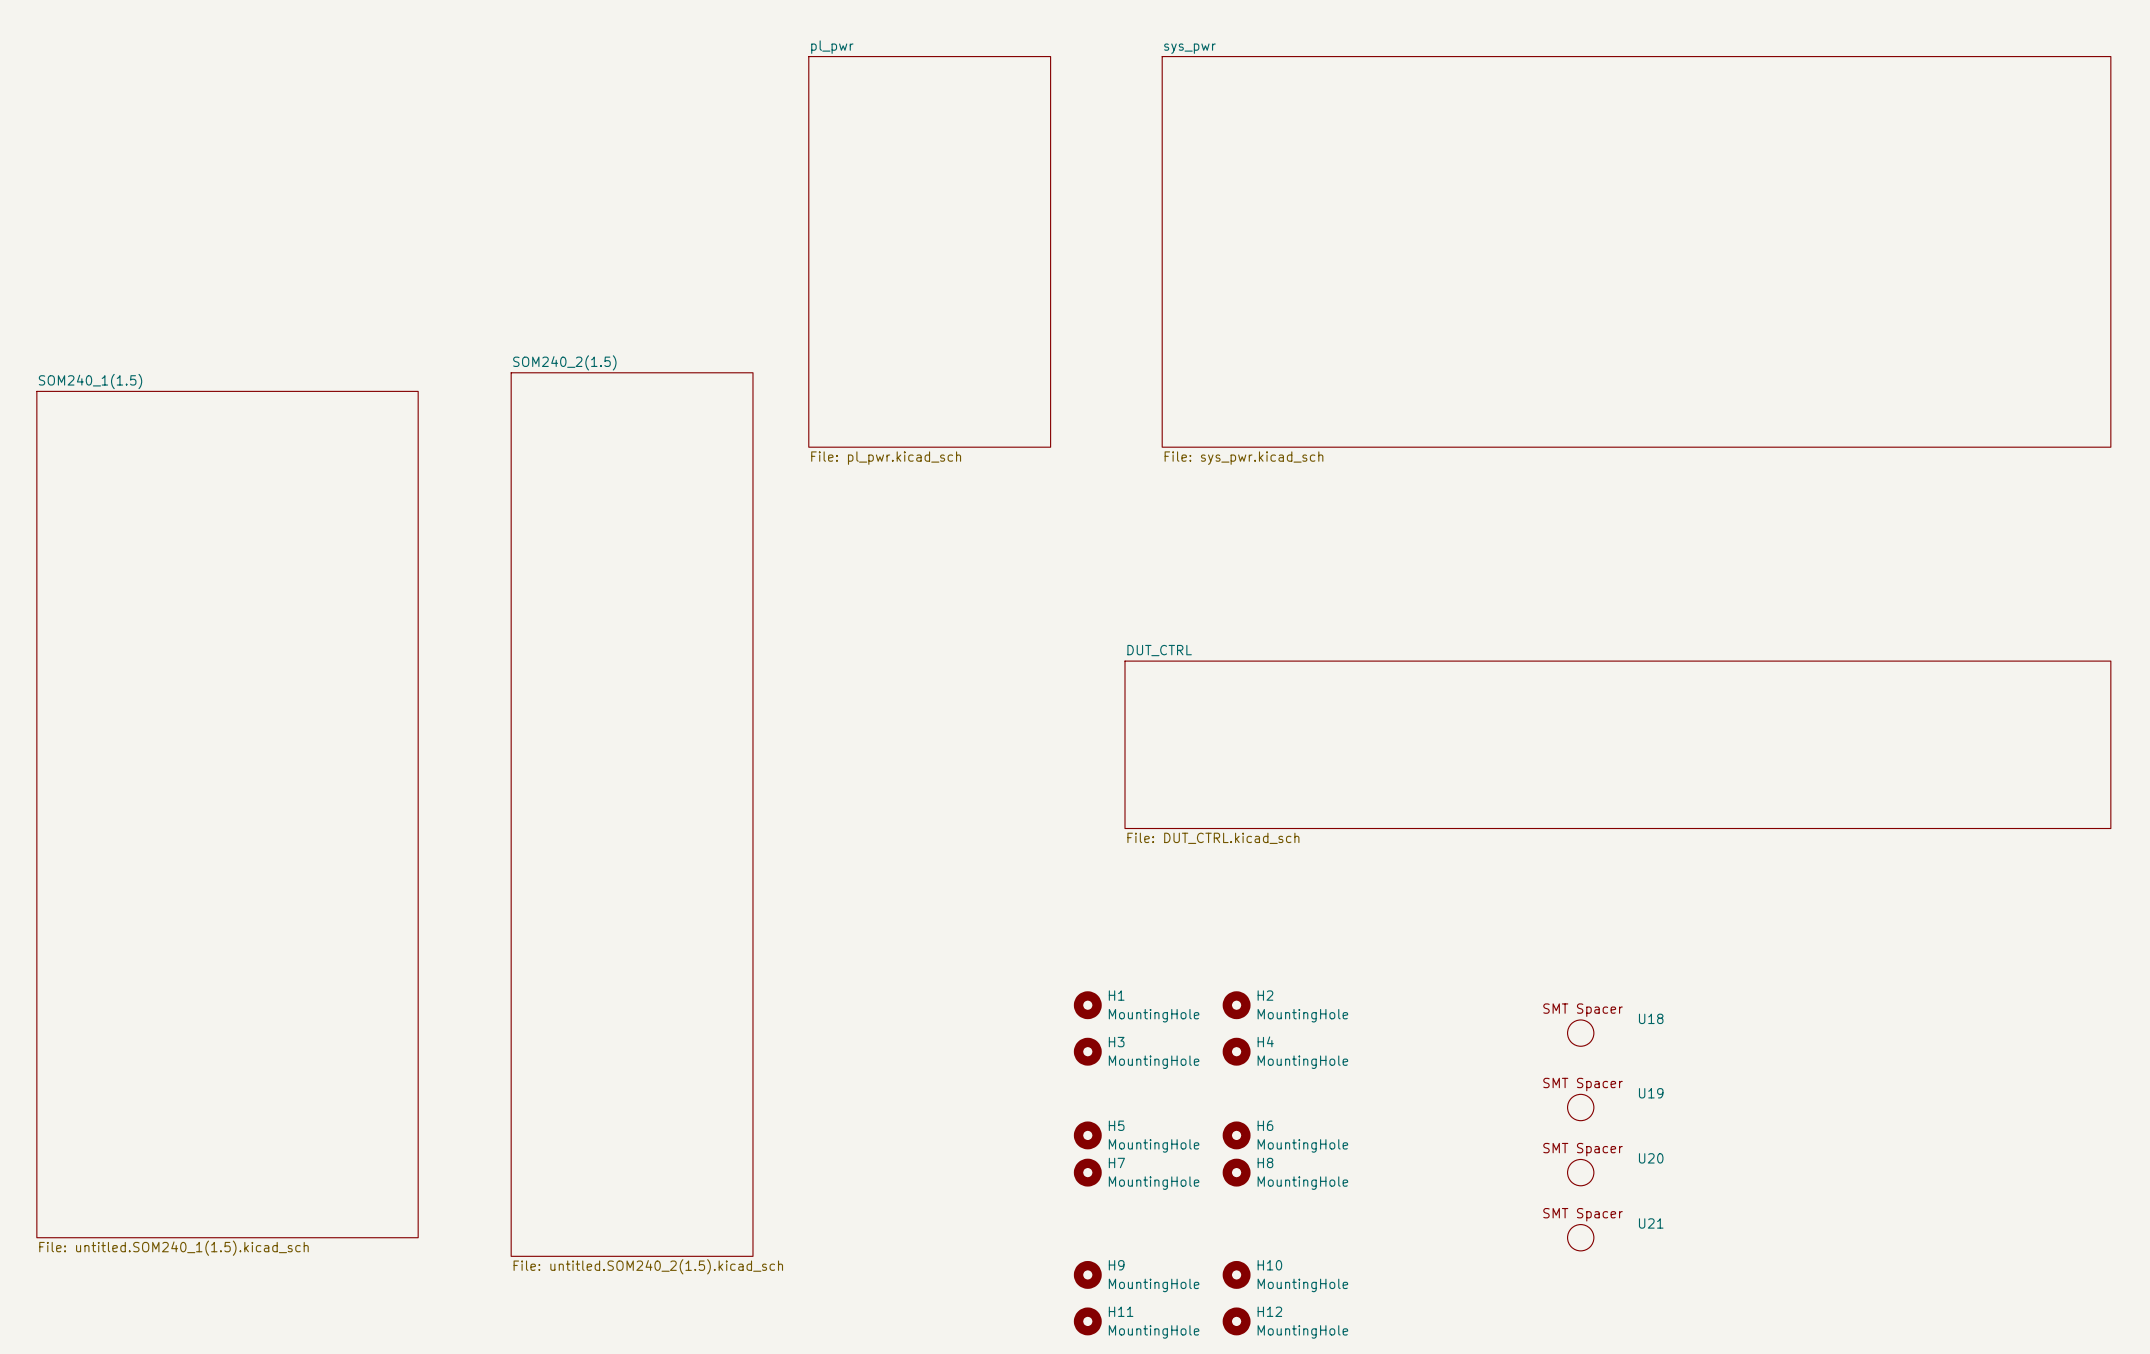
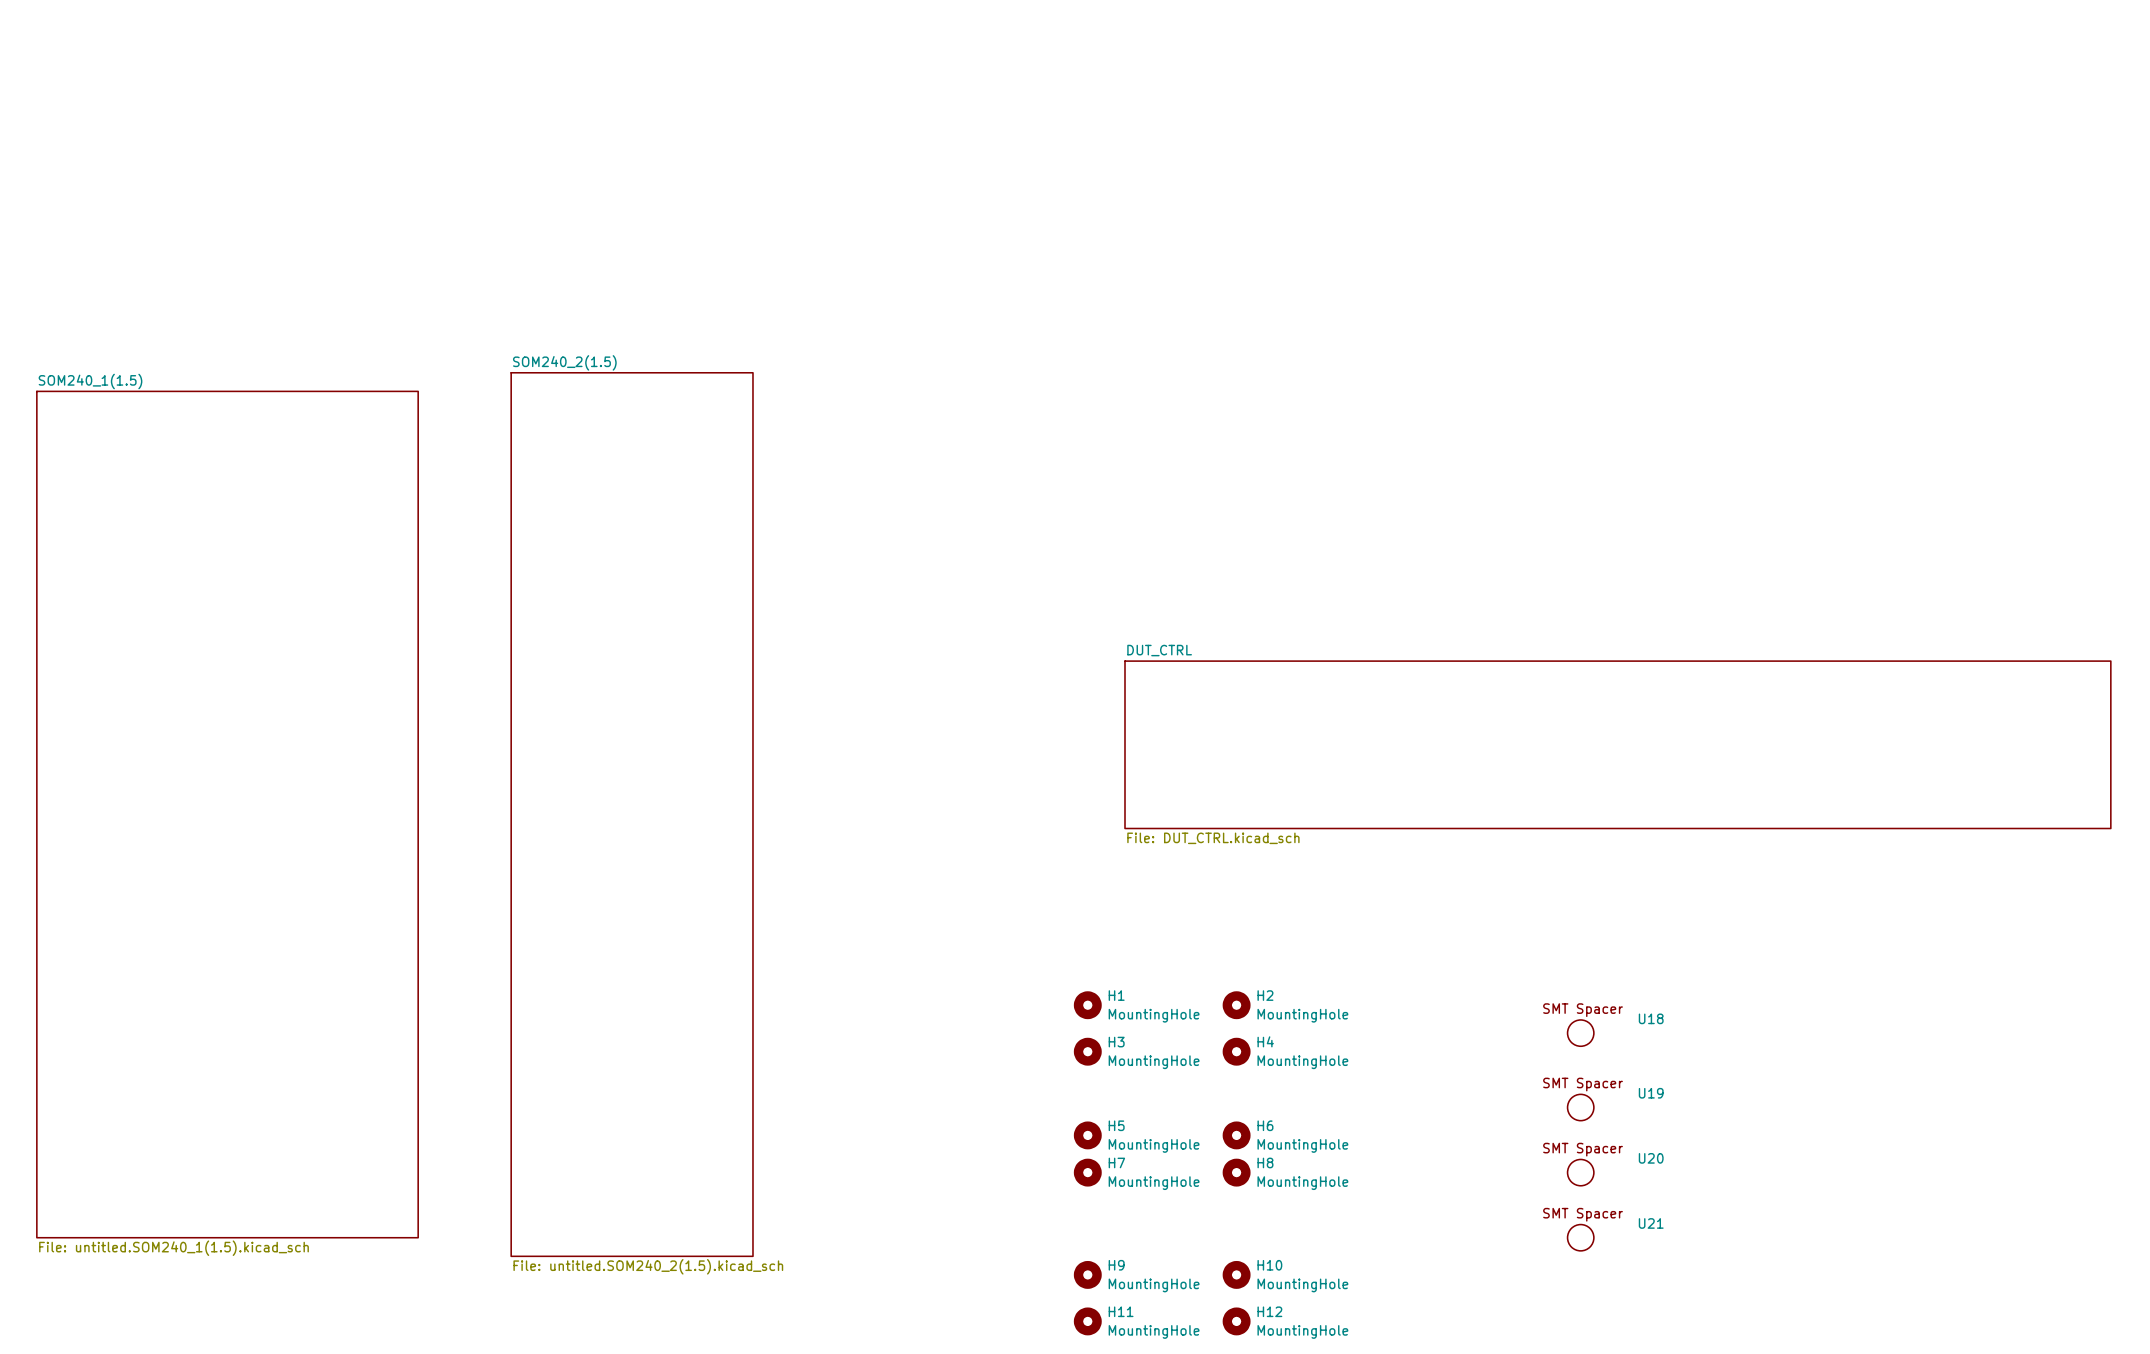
sheet pl_pwr: File: pl_pwr.kicad_sch (929, 251) -> none
sheet sys_pwr: File: sys_pwr.kicad_sch (1636, 251) -> none

